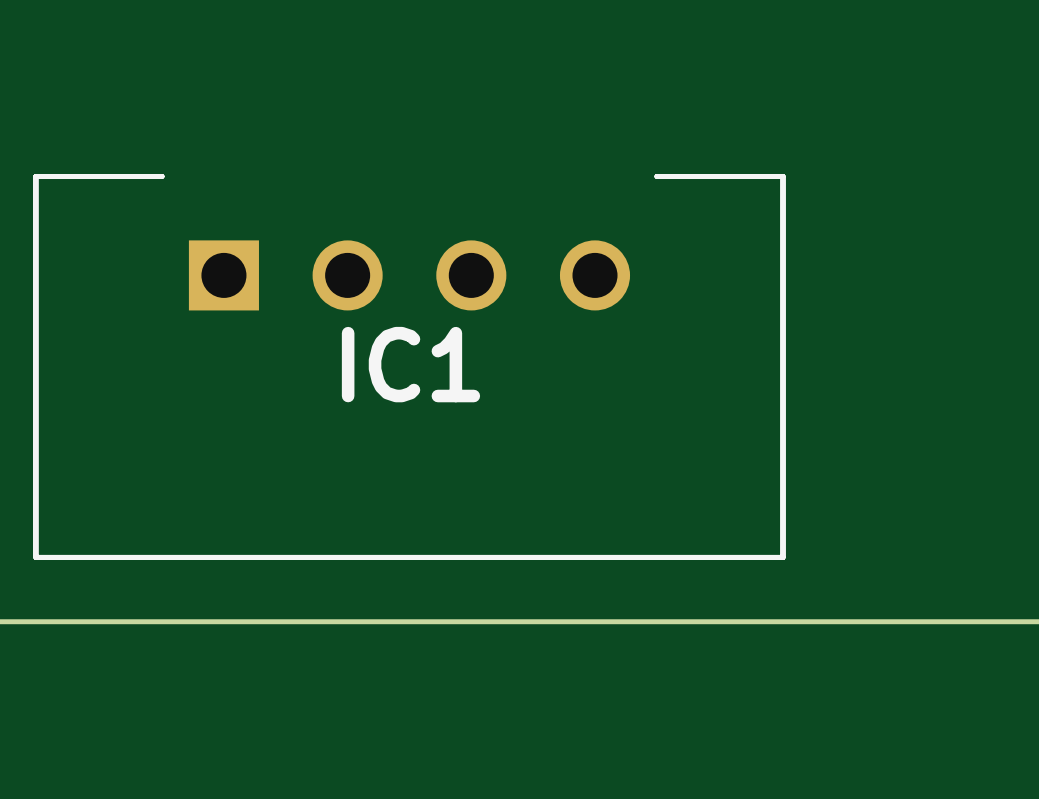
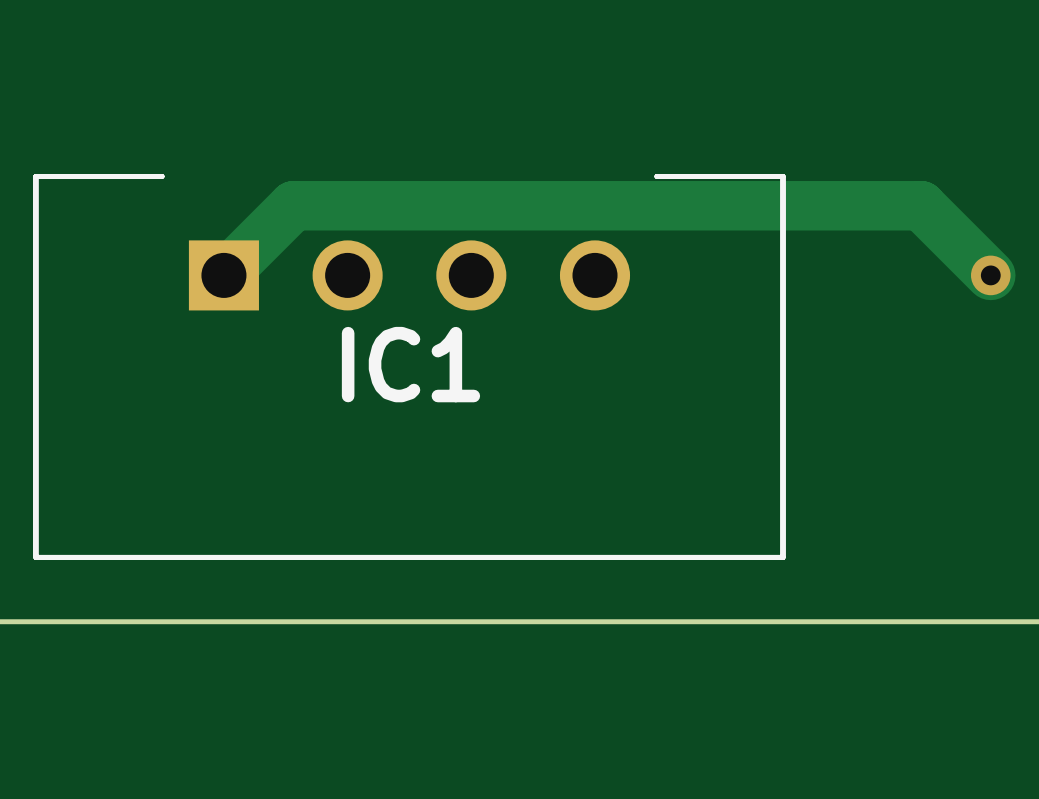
track: none -> (223, 275) (293, 205) (921, 205) (990, 275)
via: none -> (990, 275)

